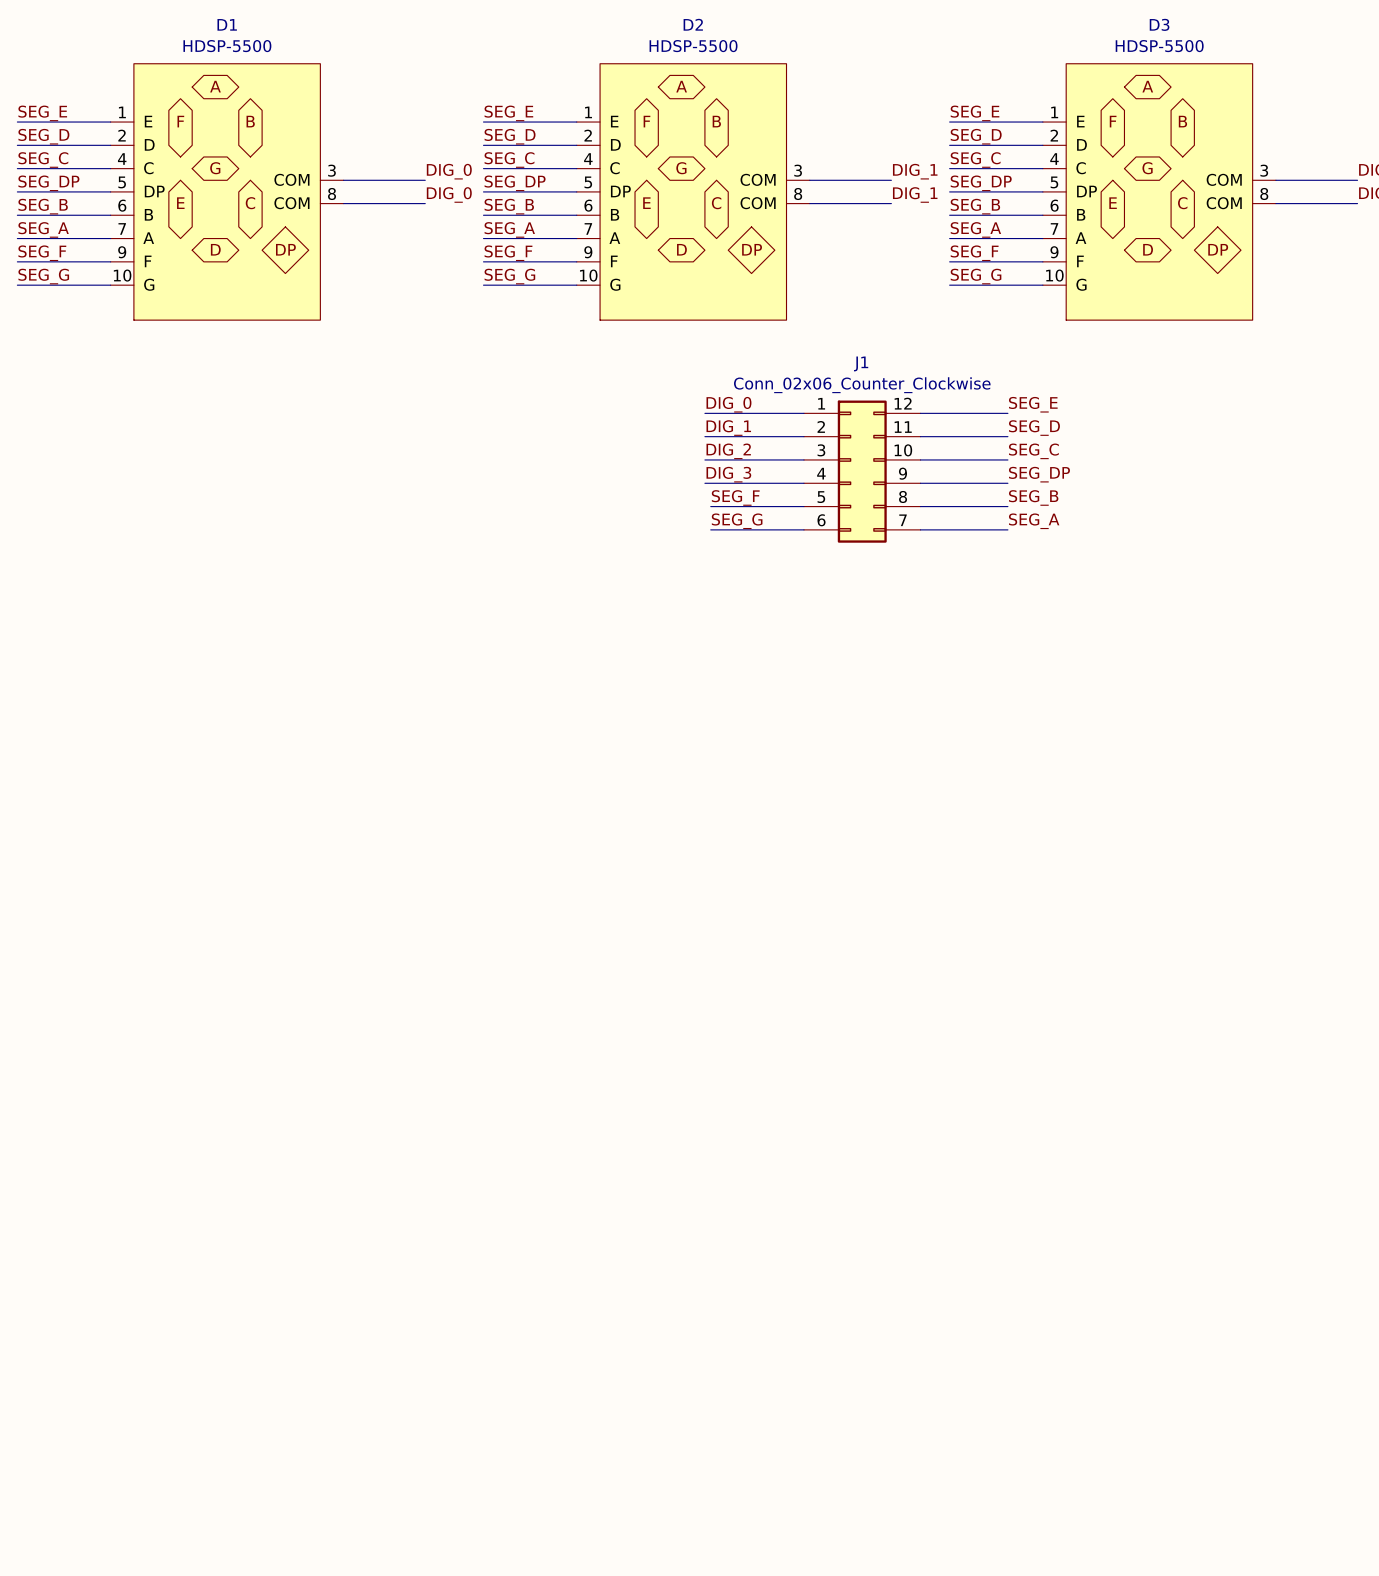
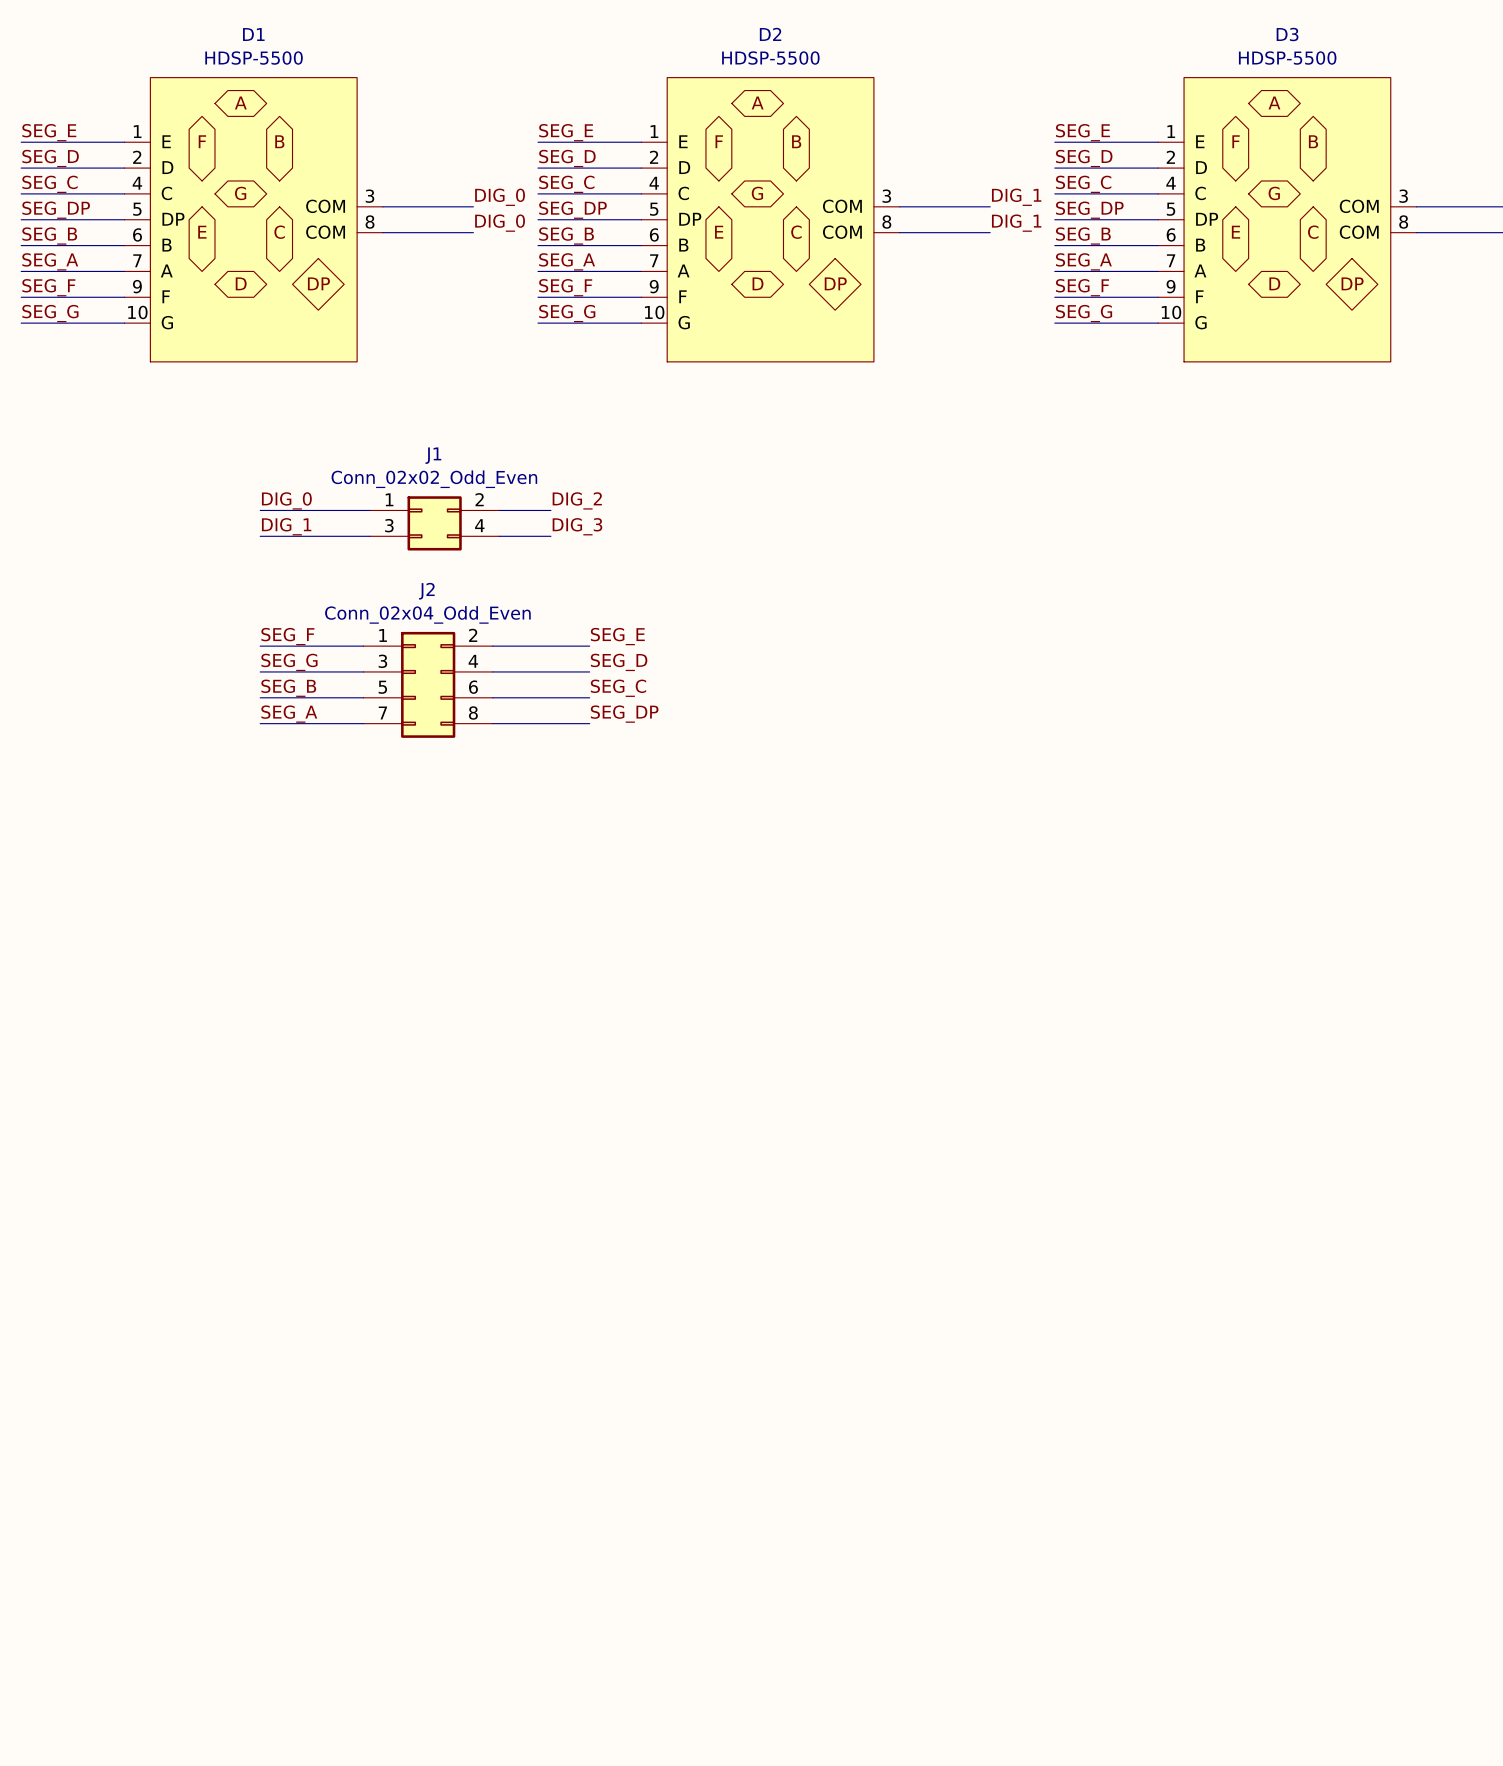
J1 name position: J1 (861, 363) -> J1 (433, 455)
J1 value: Conn_02x06_Counter_Clockwise (862, 385) -> Conn_02x02_Odd_Even (434, 479)
J1 symbol: [803, 400, 921, 543] -> [370, 496, 500, 551]
label: DIG_0 (728, 404) -> none
label: SEG_E (1033, 404) -> none
wire: (704, 413) (803, 413) -> none
wire: (920, 413) (1007, 413) -> none
label: DIG_1 (728, 428) -> none
label: SEG_D (1034, 428) -> none
wire: (704, 436) (803, 436) -> none
wire: (920, 436) (1007, 436) -> none
label: none -> DIG_0 (286, 500)
label position: DIG_2 (728, 451) -> DIG_2 (577, 500)
label: SEG_C (1033, 451) -> none
wire: none -> (260, 510) (370, 510)
wire: none -> (499, 510) (550, 510)
wire: (704, 459) (803, 459) -> none
wire: (920, 459) (1007, 459) -> none
label: none -> DIG_1 (286, 526)
label position: DIG_3 (728, 474) -> DIG_3 (577, 526)
label: SEG_DP (1039, 474) -> none
wire: none -> (260, 536) (370, 536)
wire: none -> (499, 536) (550, 536)
wire: (704, 483) (803, 483) -> none
wire: (920, 483) (1007, 483) -> none
label: SEG_F (735, 497) -> none
label: SEG_B (1033, 497) -> none
wire: (710, 506) (803, 506) -> none
wire: (920, 506) (1007, 506) -> none
label: SEG_G (737, 521) -> none
label: SEG_A (1034, 521) -> none
wire: (710, 529) (803, 529) -> none
wire: (920, 529) (1007, 529) -> none
label: none -> SEG_F (287, 636)
label: none -> SEG_E (617, 636)
wire: none -> (260, 646) (363, 646)
wire: none -> (492, 646) (589, 646)
label: none -> SEG_G (289, 662)
label: none -> SEG_D (619, 662)
wire: none -> (260, 671) (363, 671)
wire: none -> (492, 671) (589, 671)
J2: none -> Conn_02x04_Odd_Even (428, 684)
label: none -> SEG_B (288, 688)
label: none -> SEG_C (618, 688)
wire: none -> (260, 697) (363, 697)
wire: none -> (492, 697) (589, 697)
label: none -> SEG_A (289, 714)
label: none -> SEG_DP (624, 714)
wire: none -> (260, 723) (363, 723)
wire: none -> (492, 723) (589, 723)

